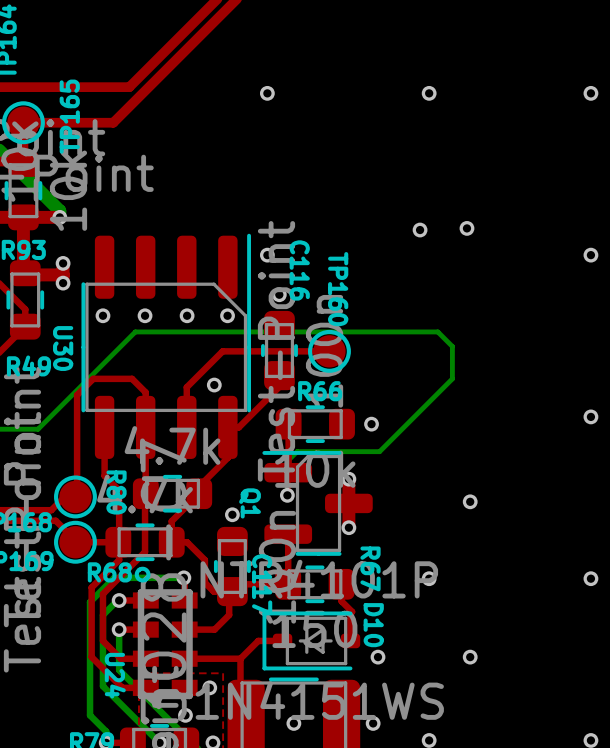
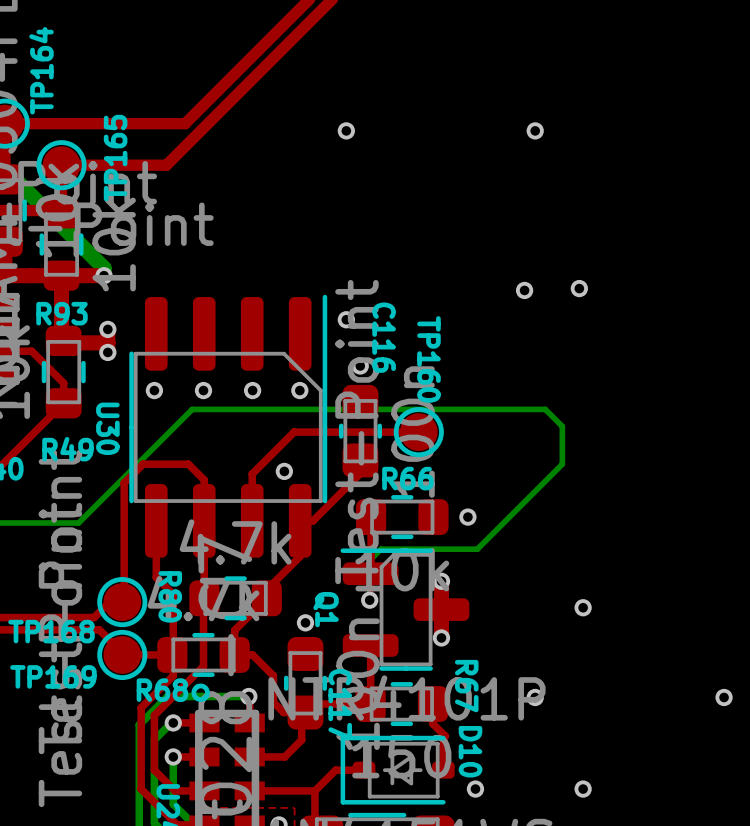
via: (590, 93) -> none
via: (590, 255) -> none
via: (590, 416) -> none

